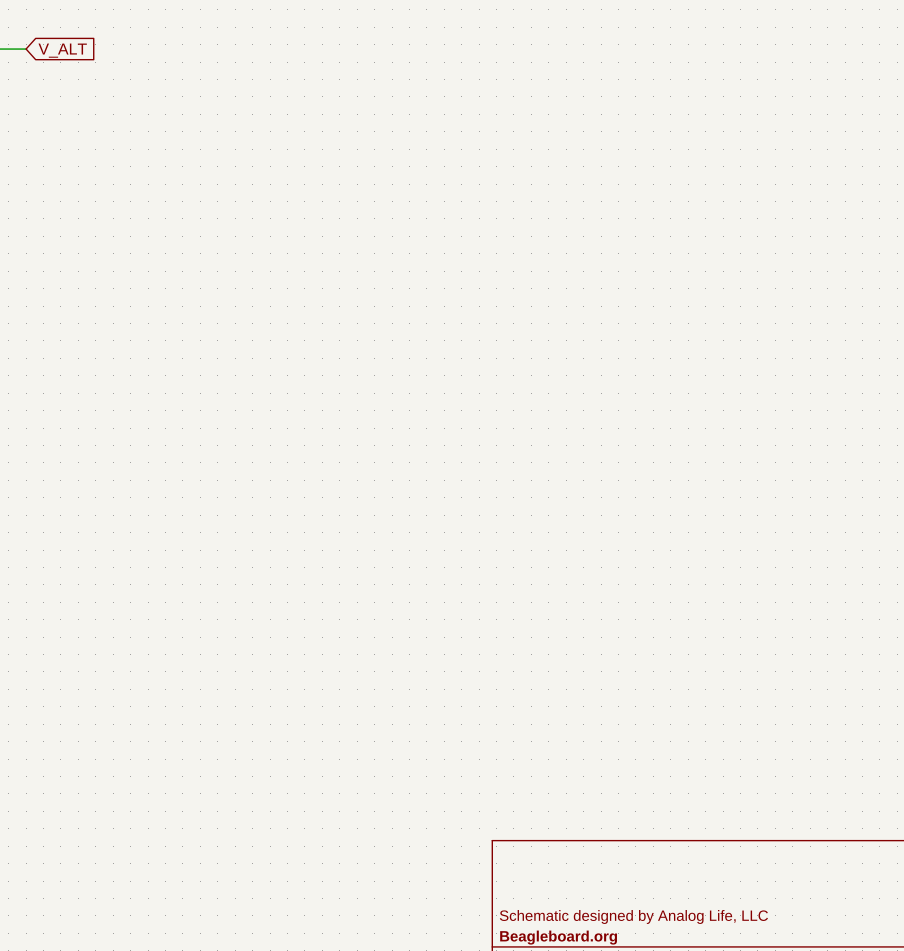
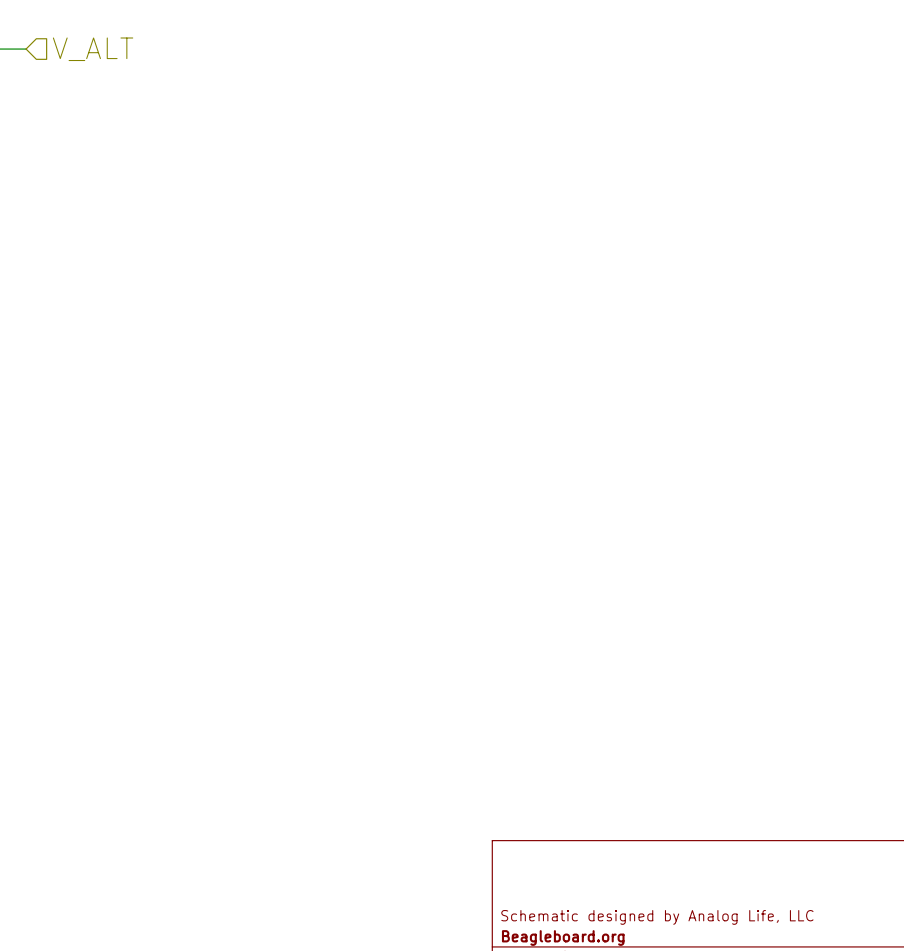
global label: V_ALT (62, 50) -> none
hierarchical label: none -> V_ALT (93, 49)

